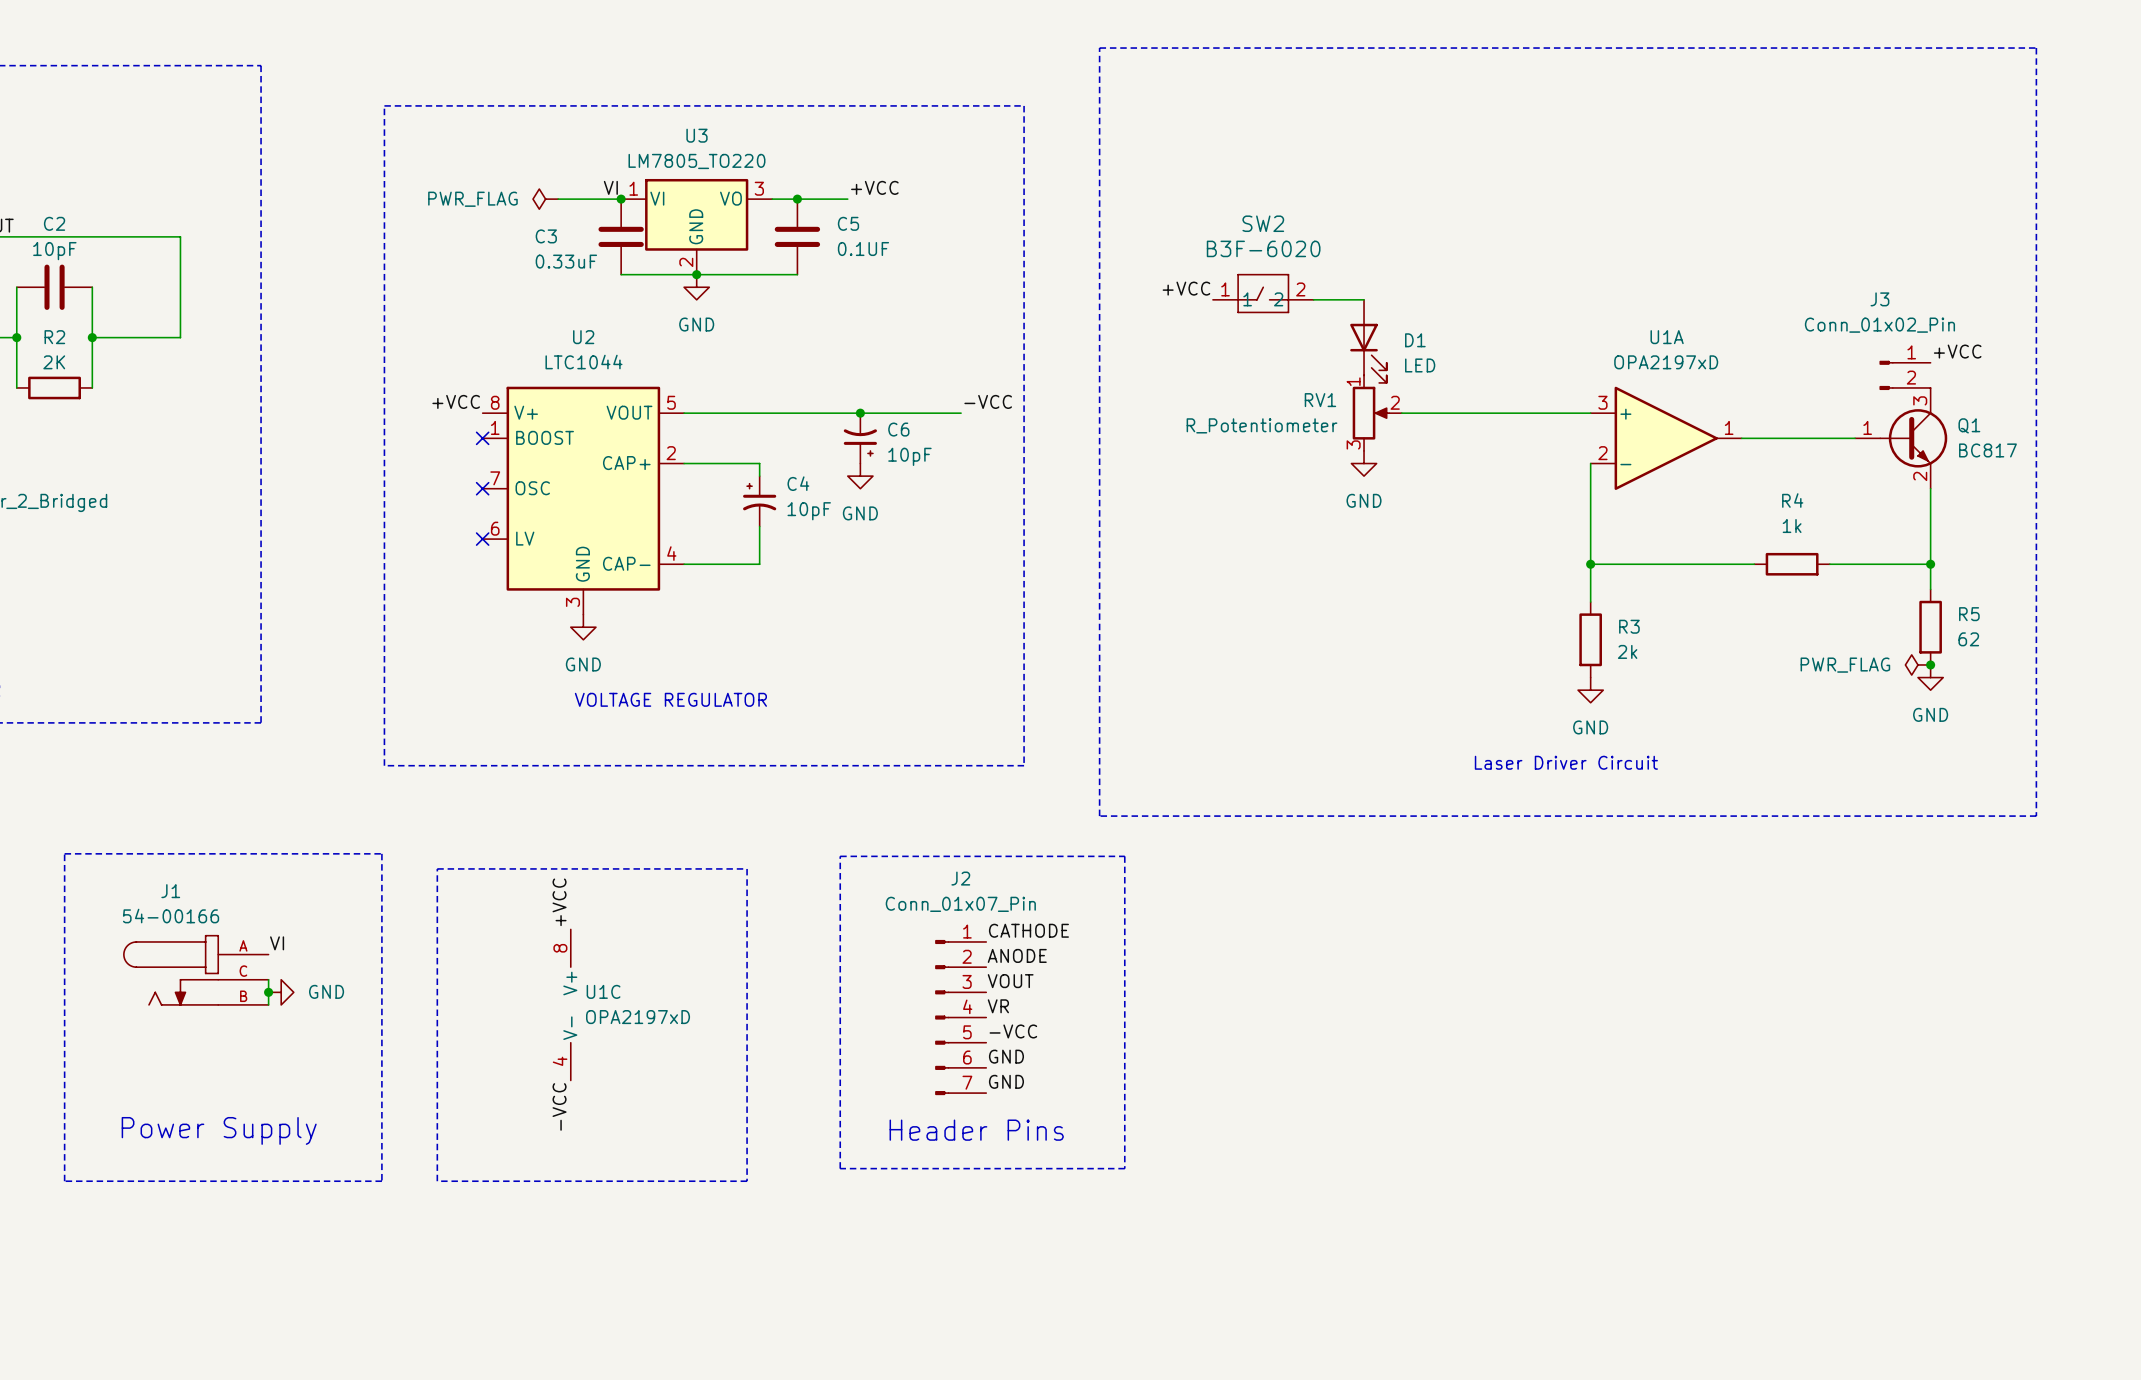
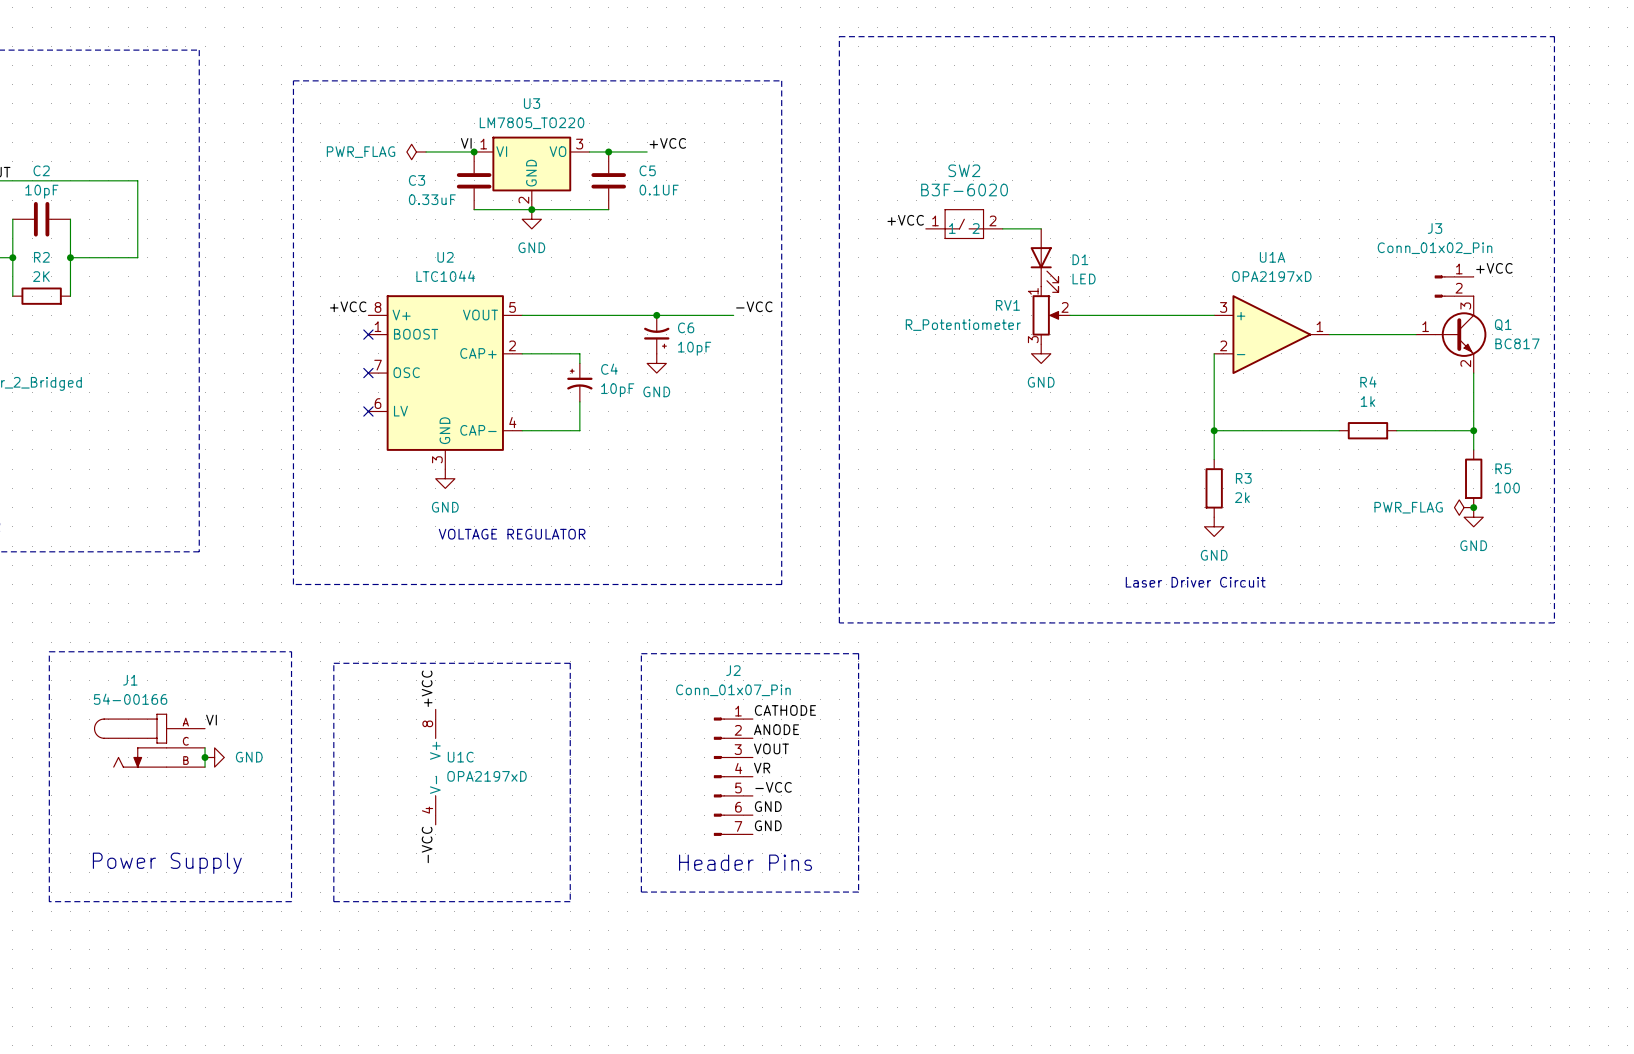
R5 value: 62 (1968, 639) -> 100 (1507, 488)

